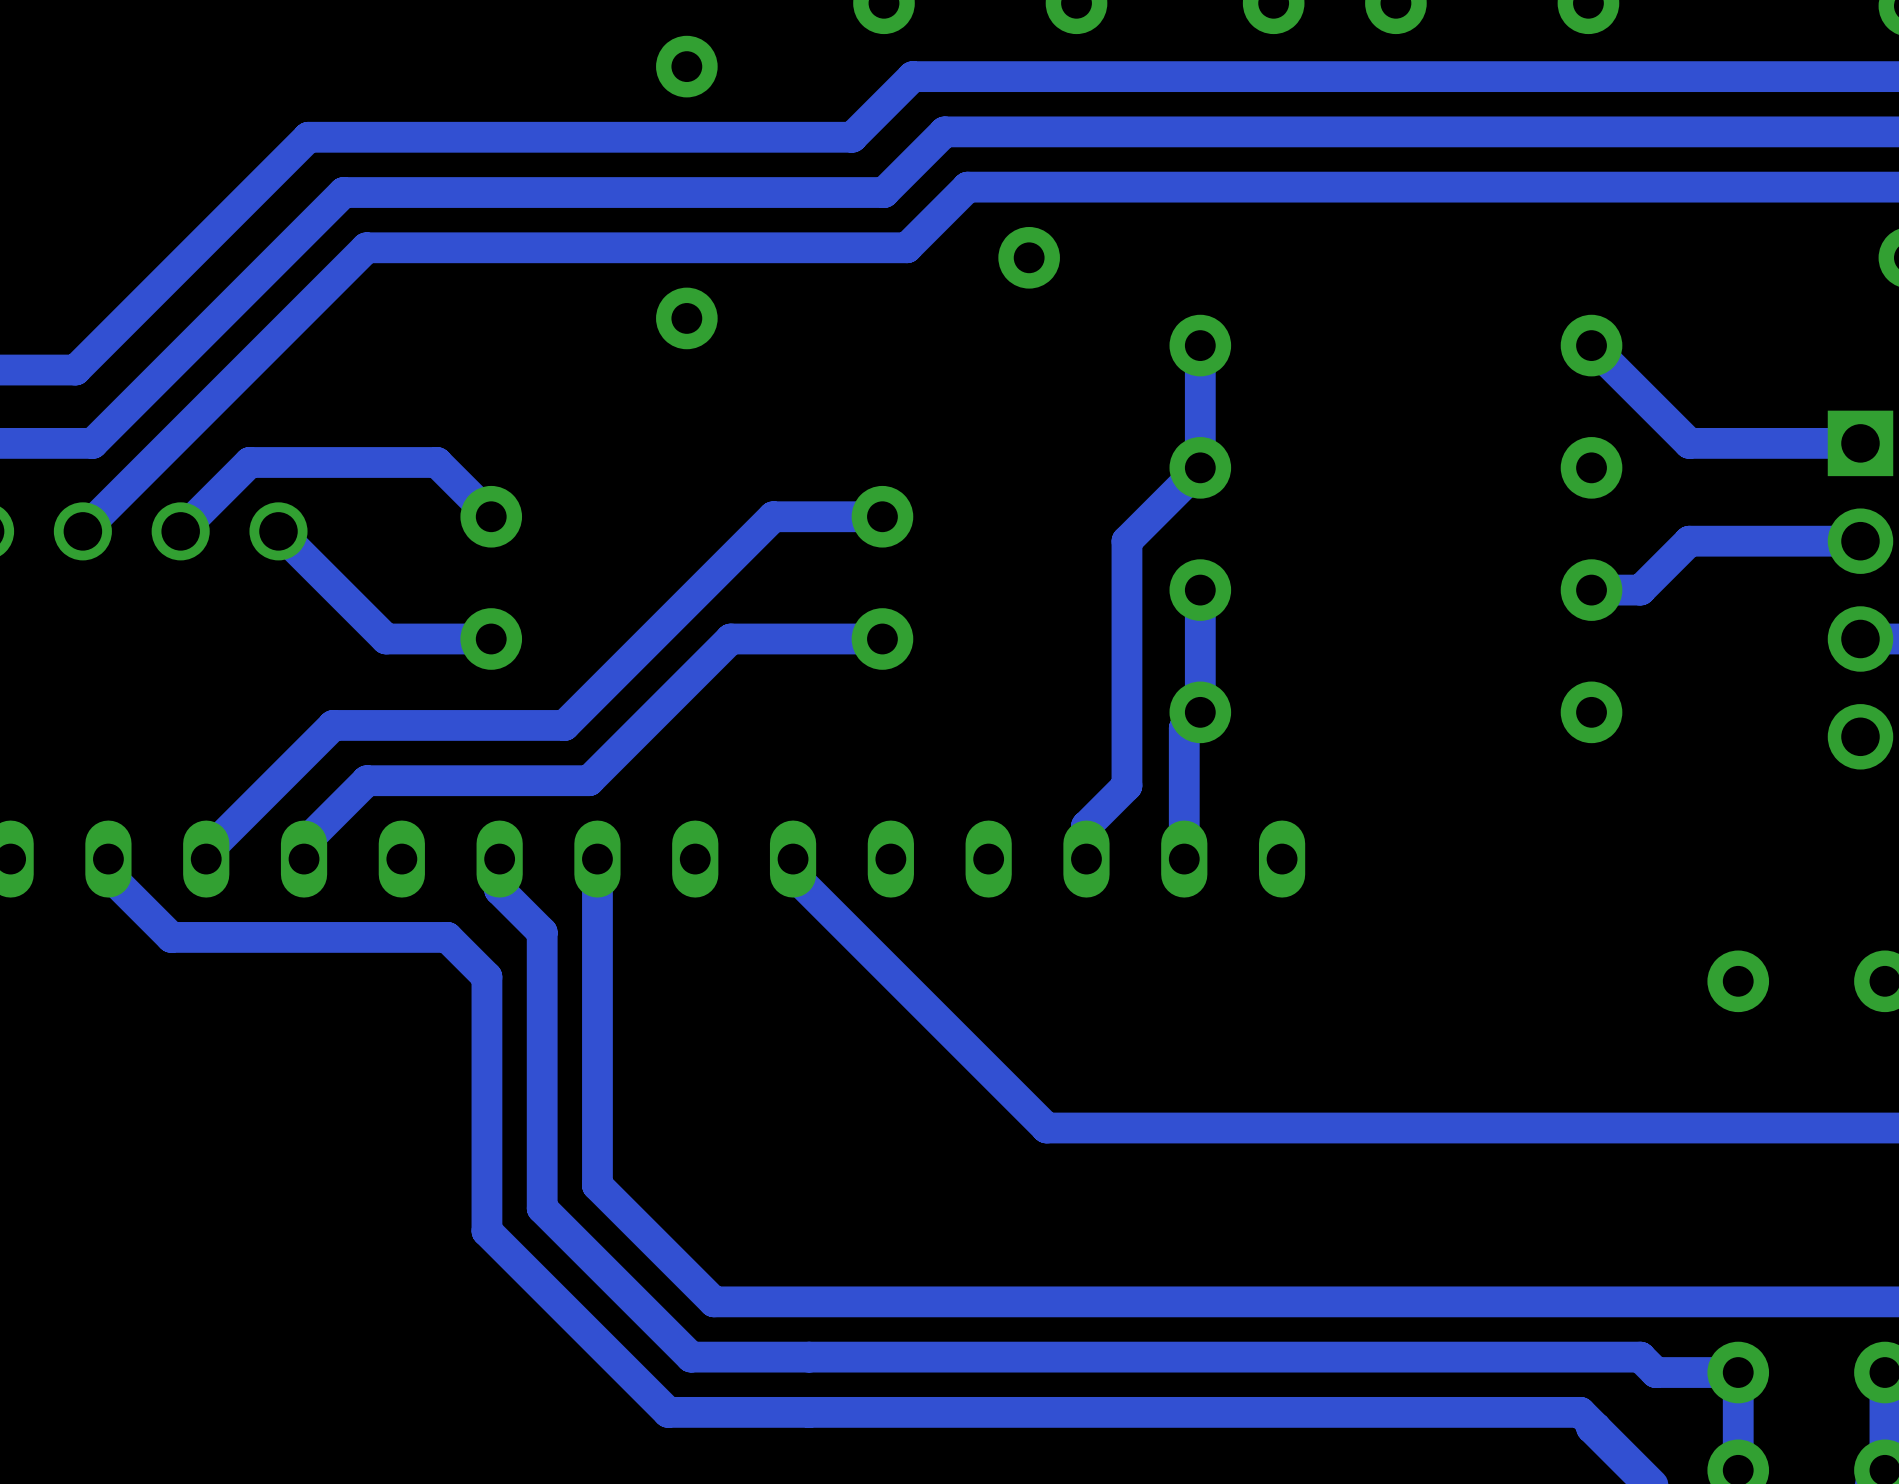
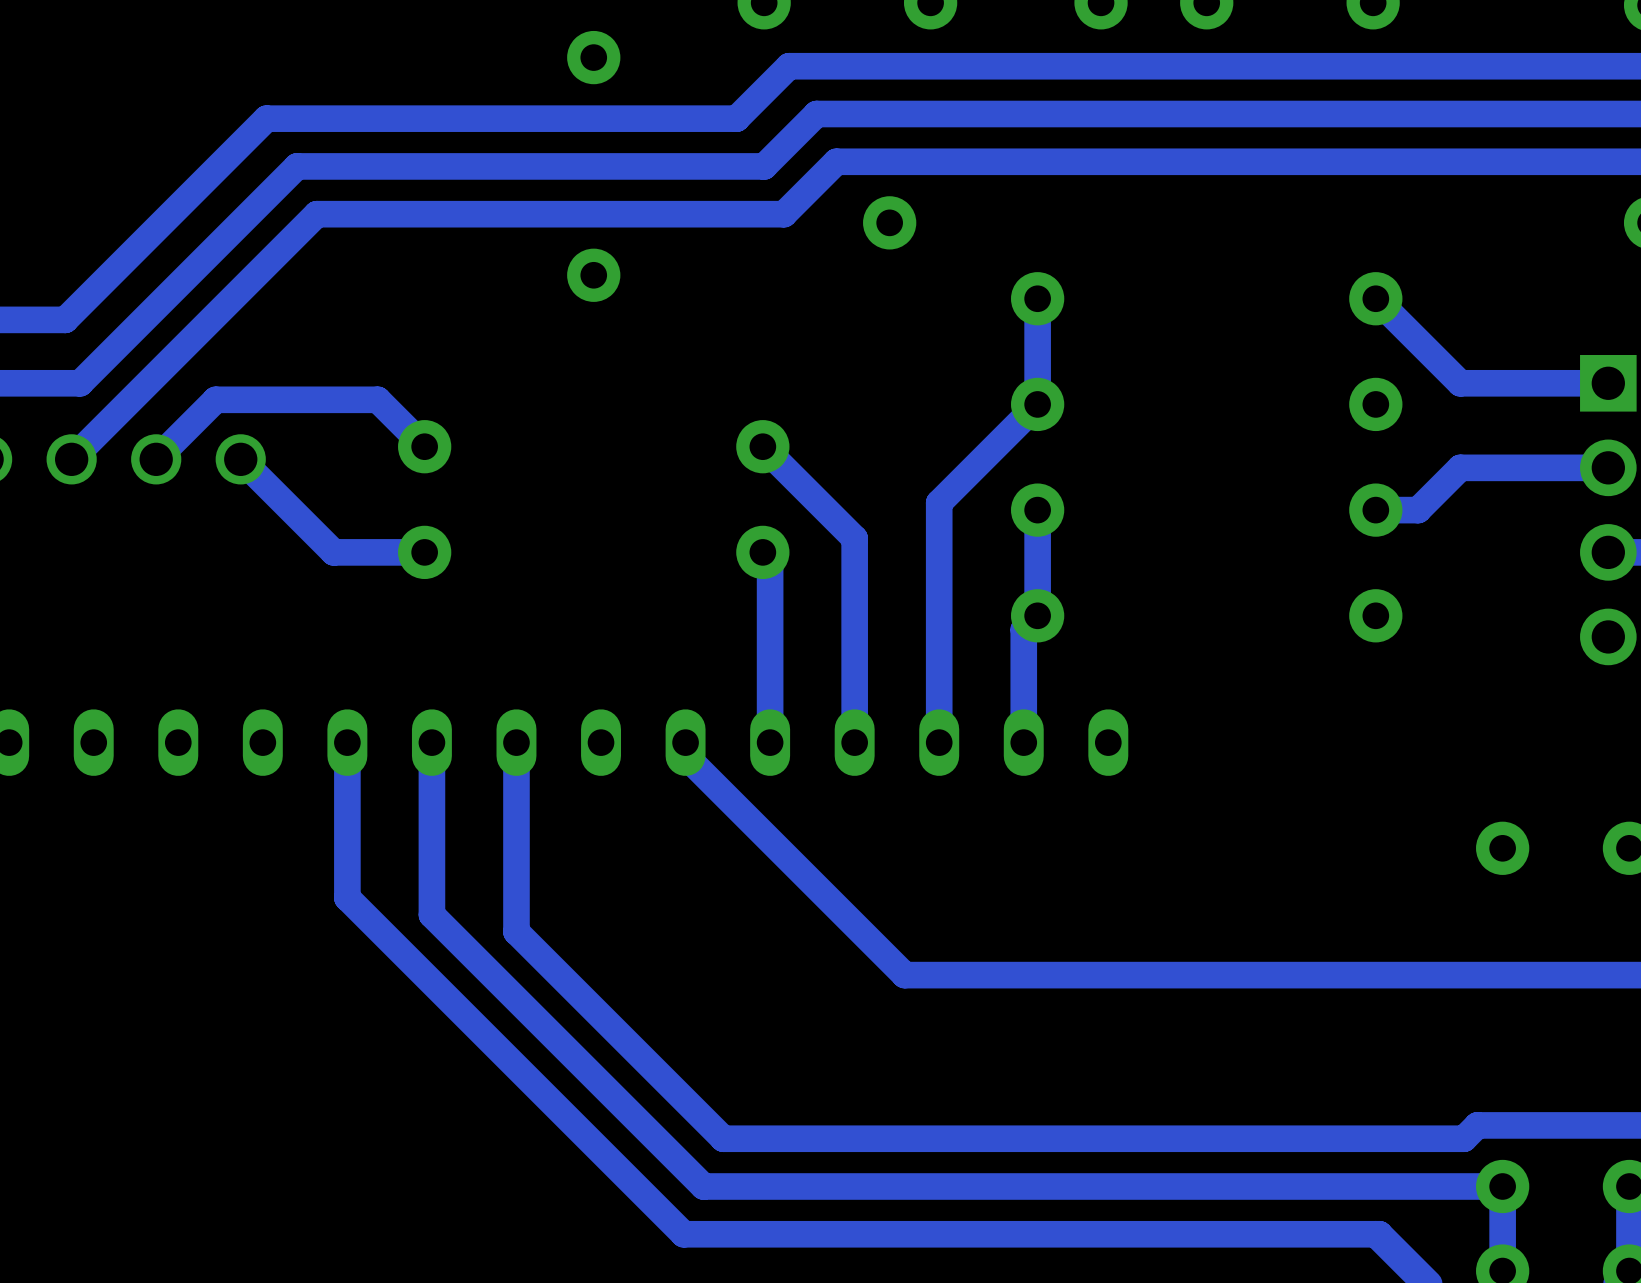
track: (882, 516) (773, 516) (564, 725) (333, 725) (206, 852) (206, 859) -> (762, 446) (854, 538) (854, 742)
track: (1126, 541) (1126, 785) (1086, 826) -> (974, 467) (939, 502) (939, 714)
track: (882, 638) (730, 638) (589, 780) (366, 780) (304, 843) (304, 859) -> (762, 552) (770, 559) (770, 742)
track: (108, 859) (108, 874) (171, 937) (447, 937) (486, 977) (486, 1231) (668, 1412) (1580, 1412) (1595, 1427) -> none
track: none -> (347, 742) (347, 897) (683, 1234) (1375, 1234)
track: (499, 889) (542, 932) (542, 1208) (691, 1357) (1640, 1357) (1655, 1372) -> (431, 769) (431, 914) (703, 1186) (1431, 1186)
track: (597, 1077) (597, 1185) (713, 1301) (1708, 1301) -> (516, 931) (723, 1138) (1464, 1138) (1477, 1125)

